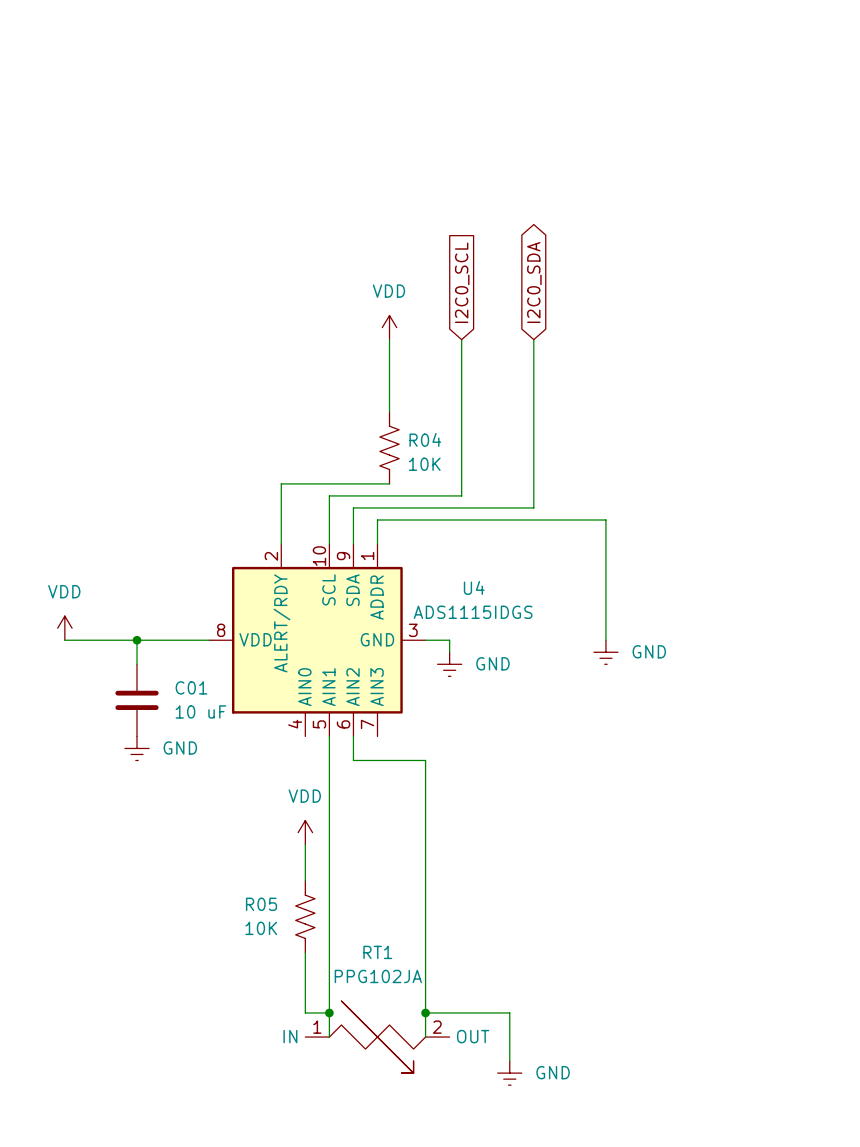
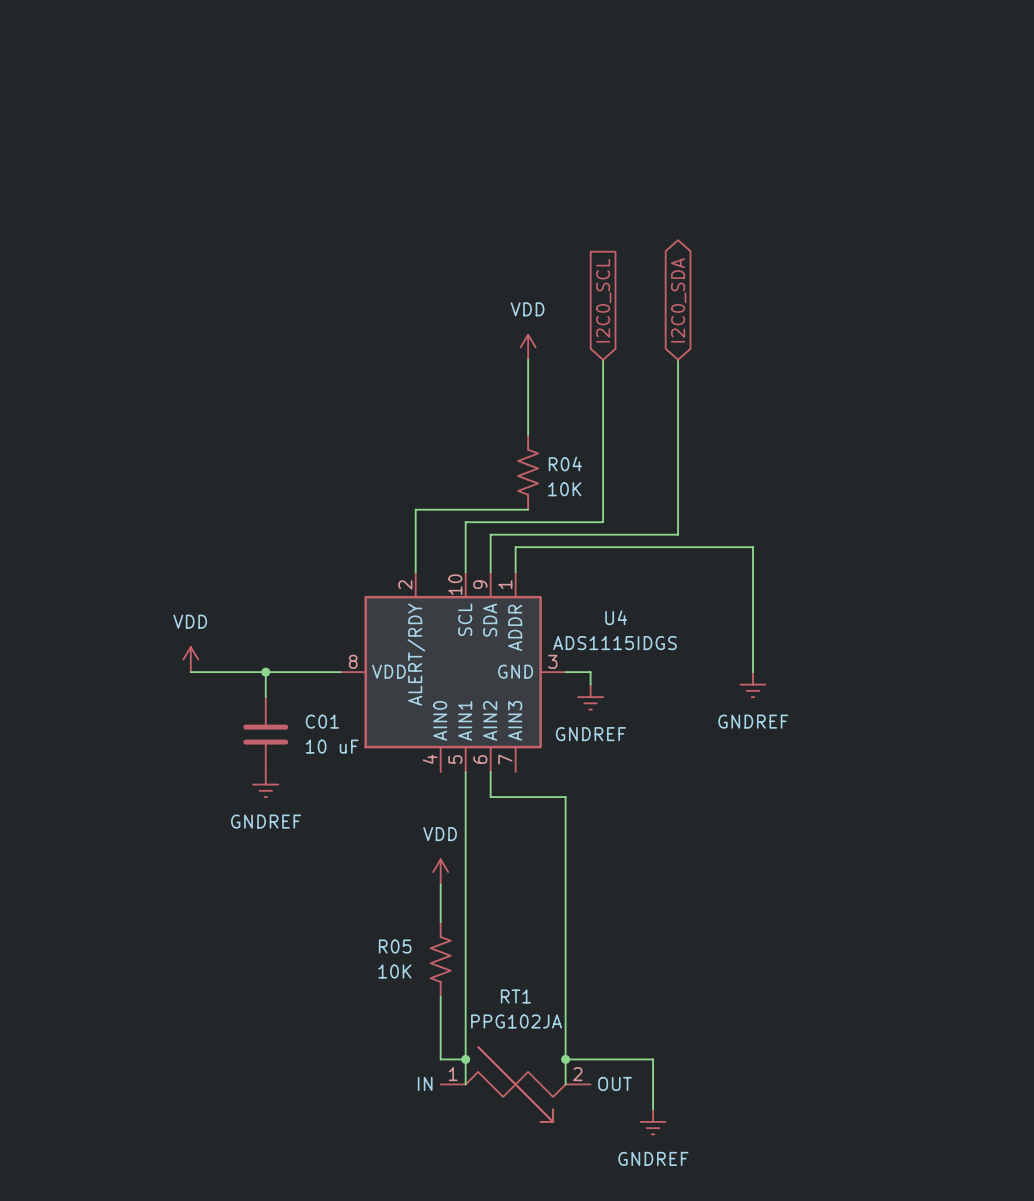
power symbol: GND (605, 652) -> GNDREF (753, 684)
power symbol: GND (449, 664) -> GNDREF (590, 697)
power symbol: GND (137, 748) -> GNDREF (265, 784)
power symbol: GND (509, 1073) -> GNDREF (653, 1121)

